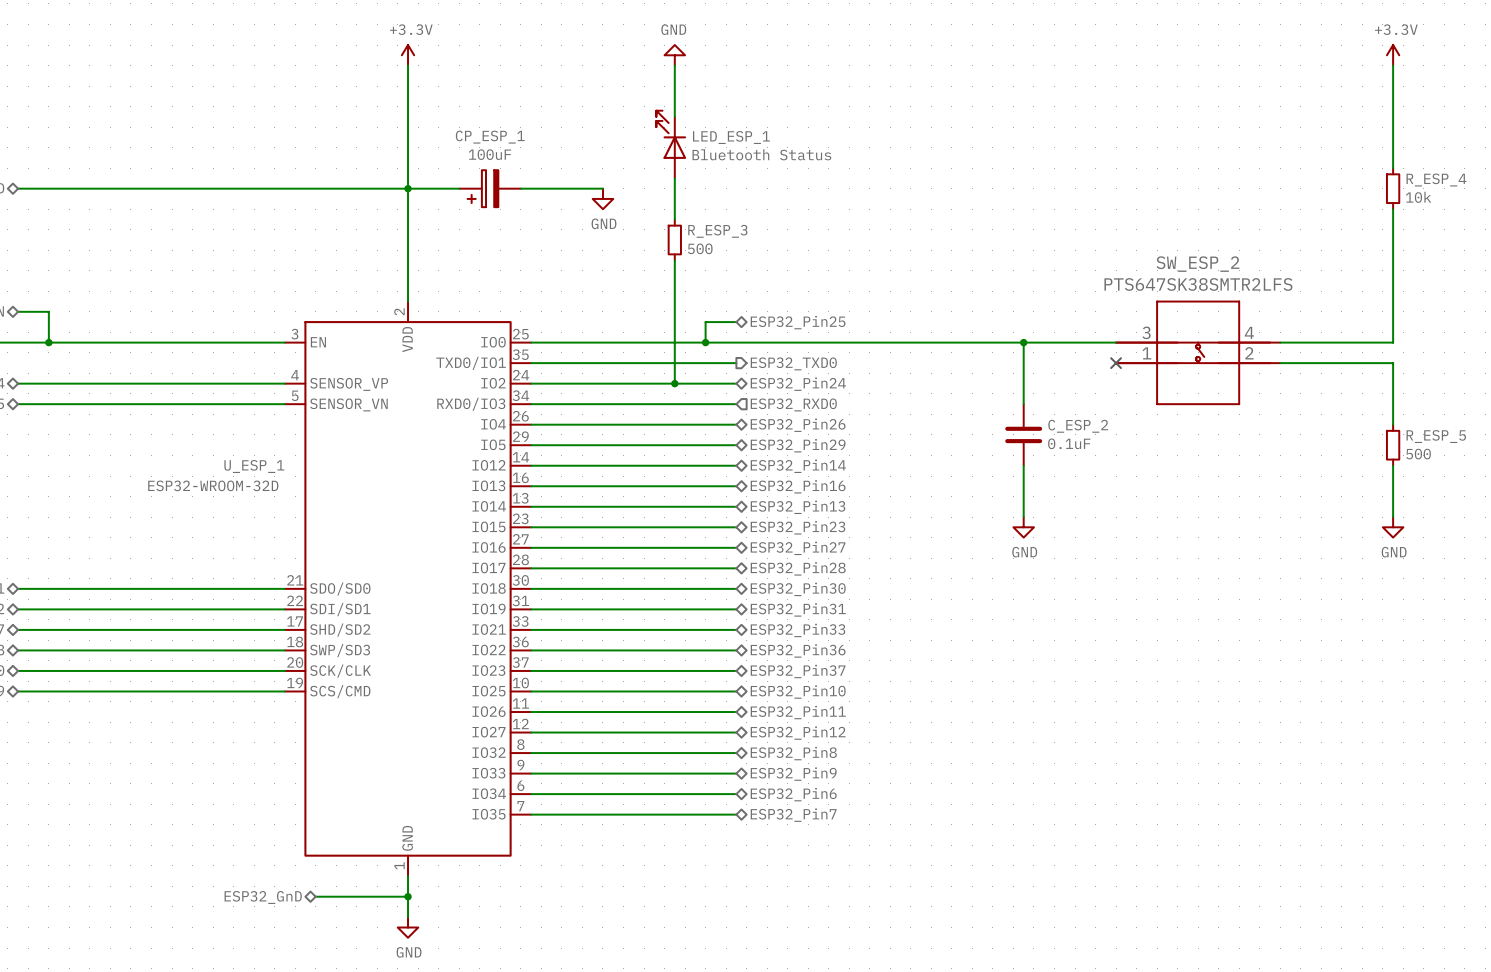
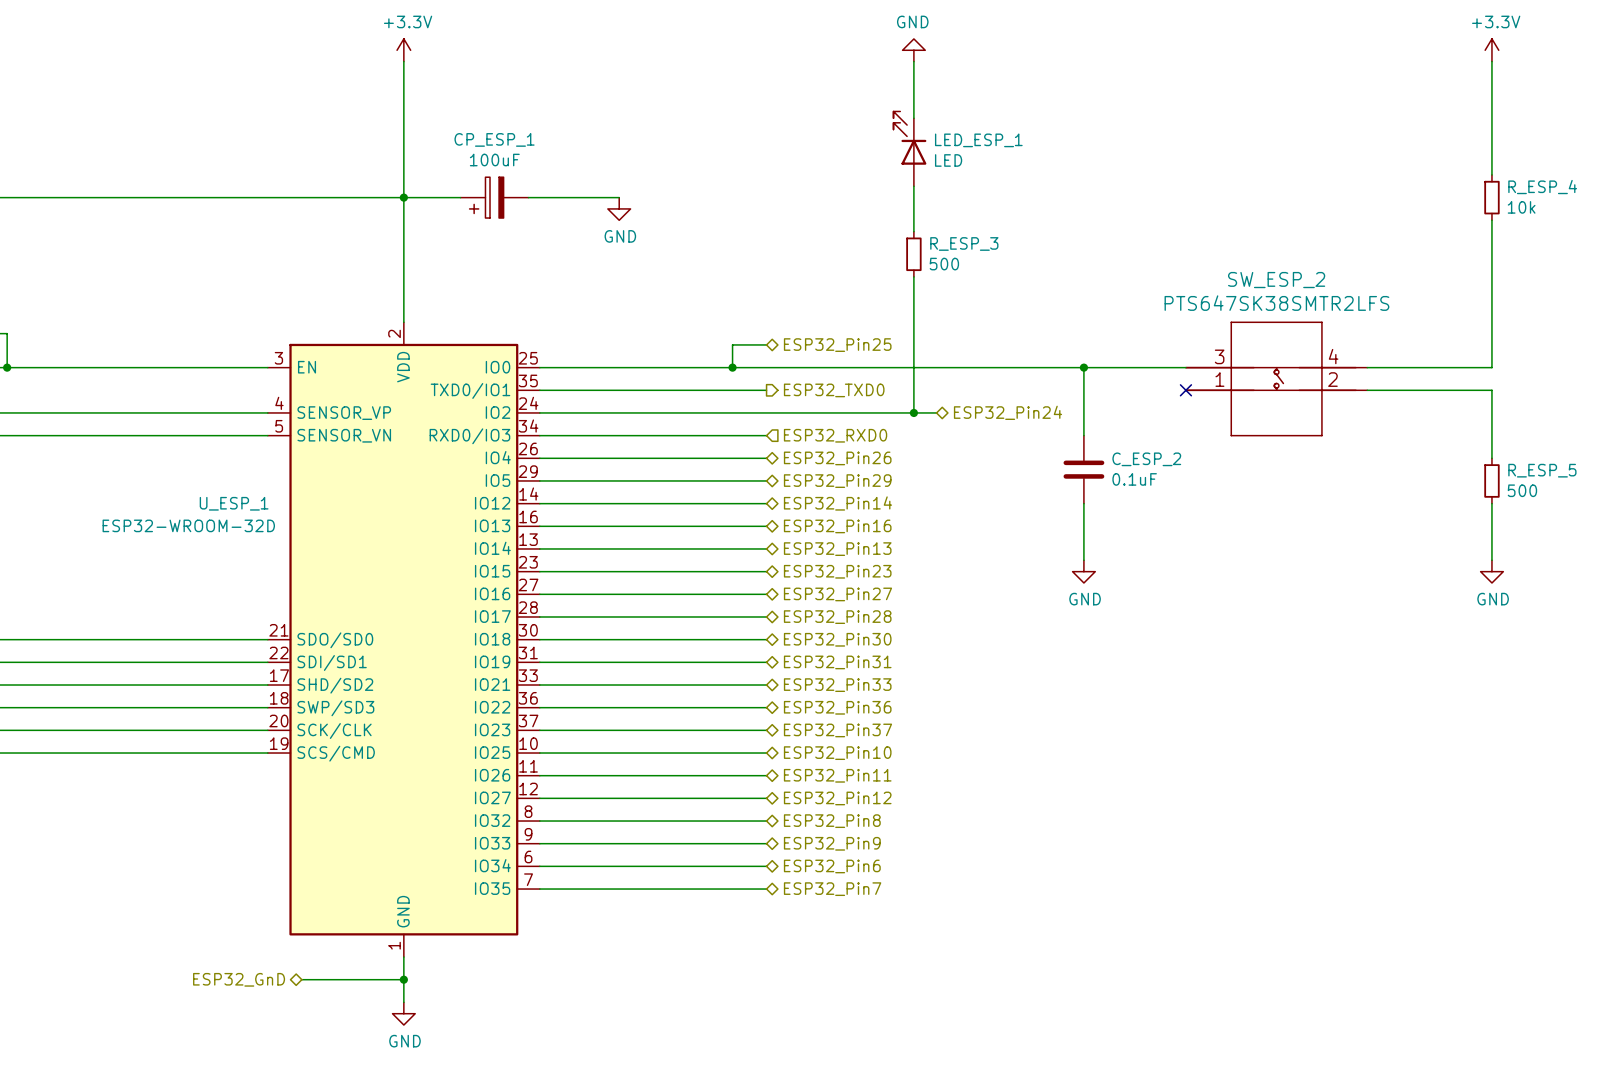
power symbol position: GND (674, 55) -> GND (913, 50)
wire: (674, 65) (674, 116) -> (913, 61) (913, 118)
LED_ESP_1 position: (671, 144) -> (909, 148)
LED_ESP_1 value: Bluetooth Status (761, 154) -> LED (948, 160)
wire: (674, 178) (674, 219) -> (913, 186) (913, 231)
R_ESP_3 position: (674, 239) -> (913, 254)
wire: (674, 260) (674, 383) -> (913, 276) (913, 412)
junction: (674, 383) -> none
wire: none -> (766, 412) (936, 412)
junction: none -> (913, 412)
hierarchical label position: ESP32_Pin24 (798, 384) -> ESP32_Pin24 (1008, 412)

